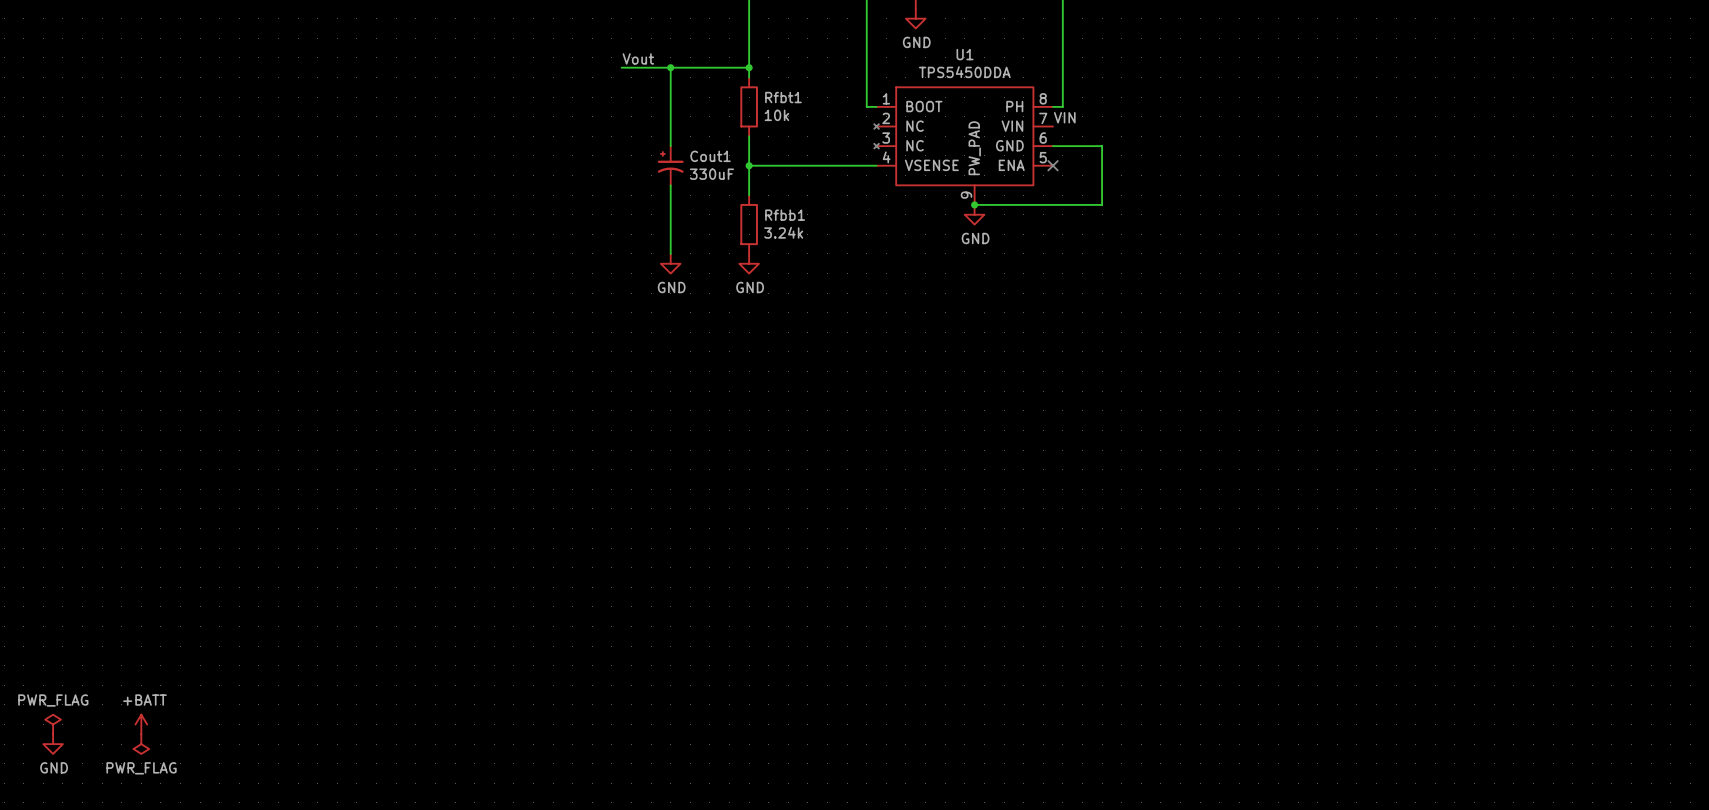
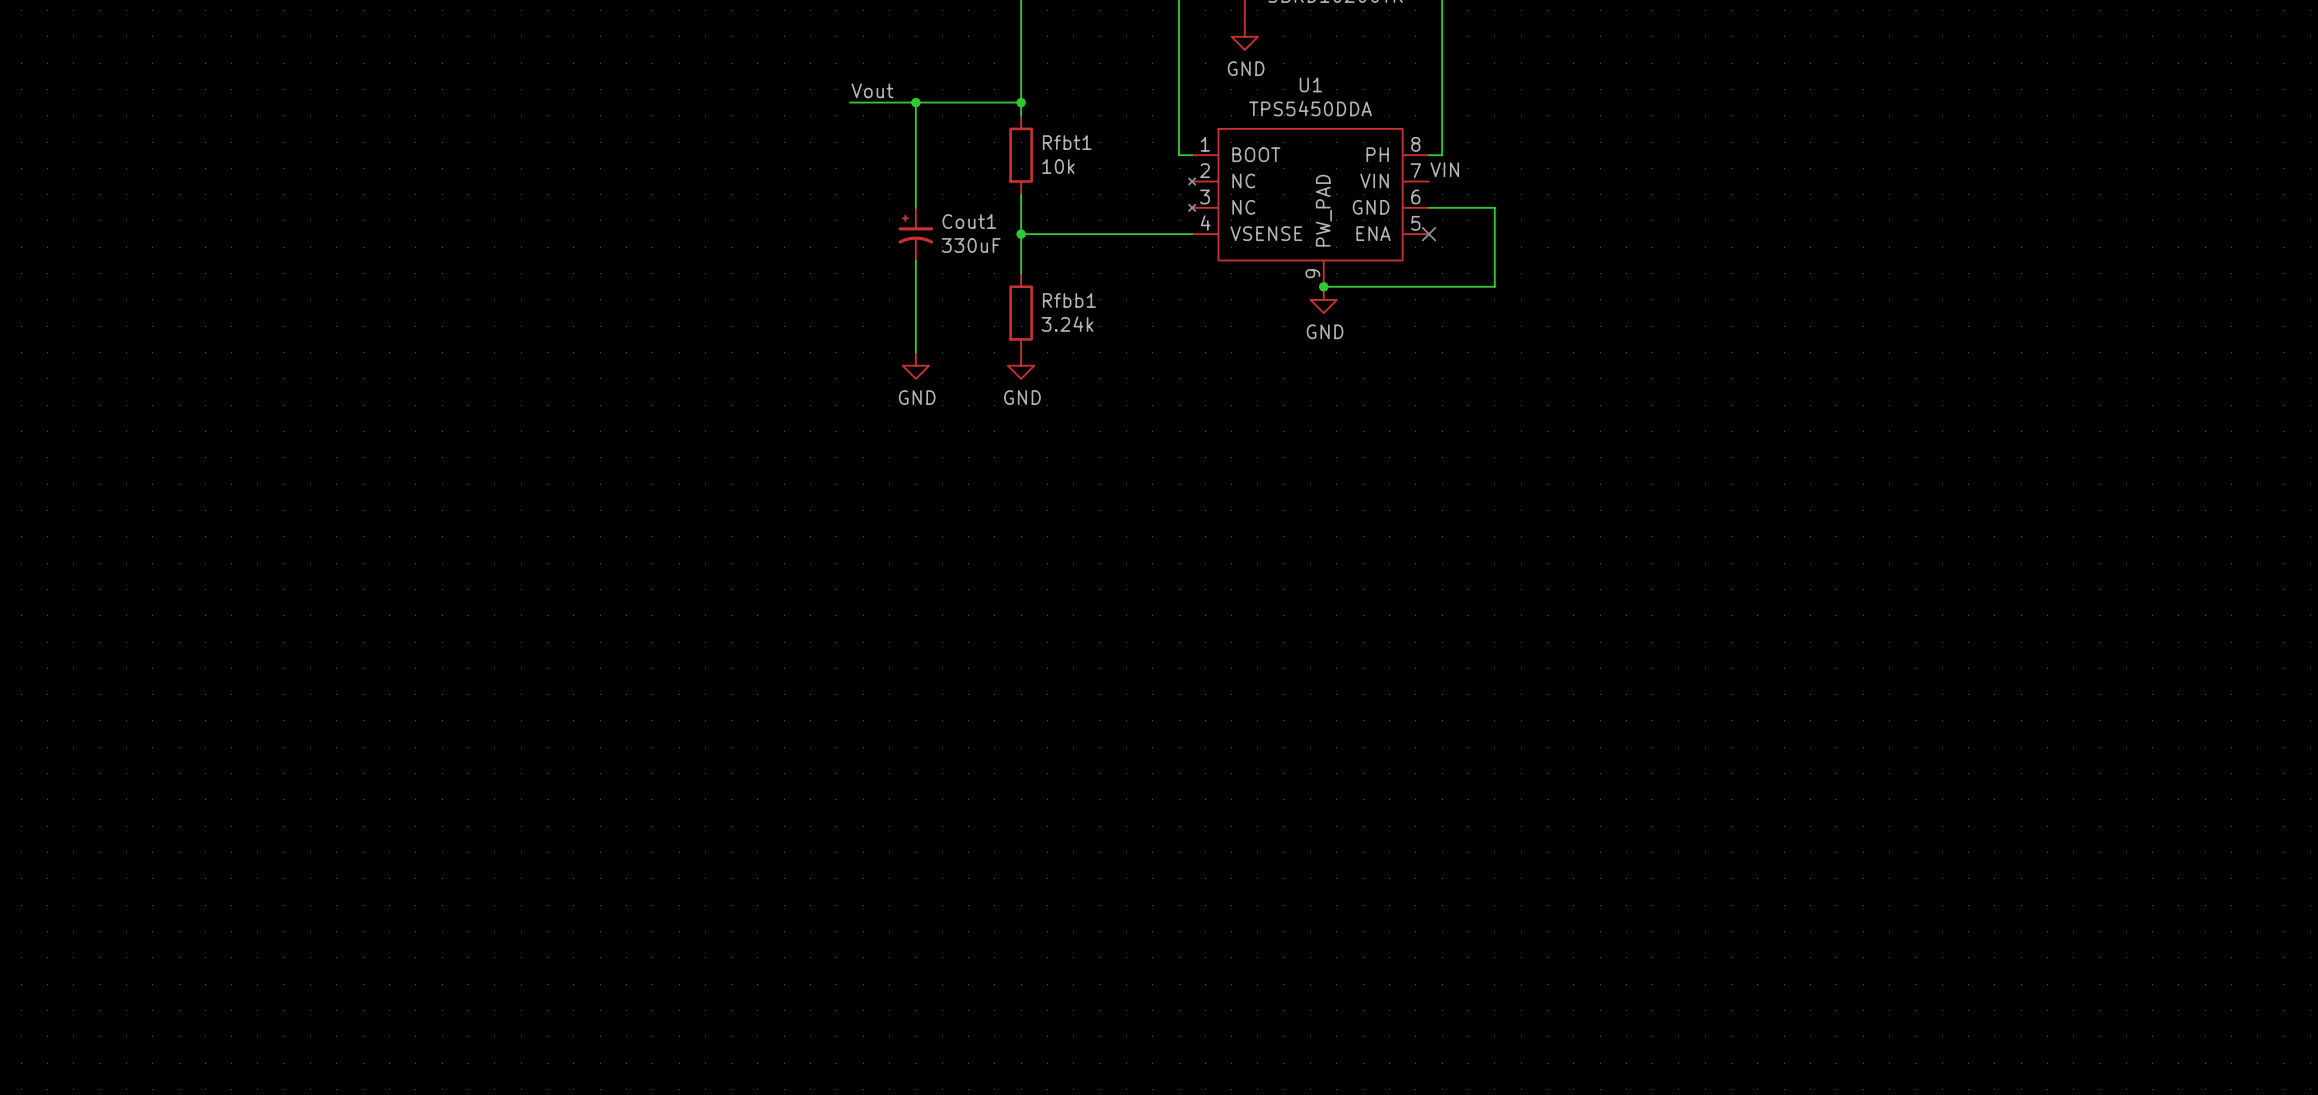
power symbol: PWR_FLAG (53, 724) -> none
power symbol: +BATT (141, 724) -> none
power symbol: GND (53, 744) -> none
power symbol: PWR_FLAG (141, 744) -> none

